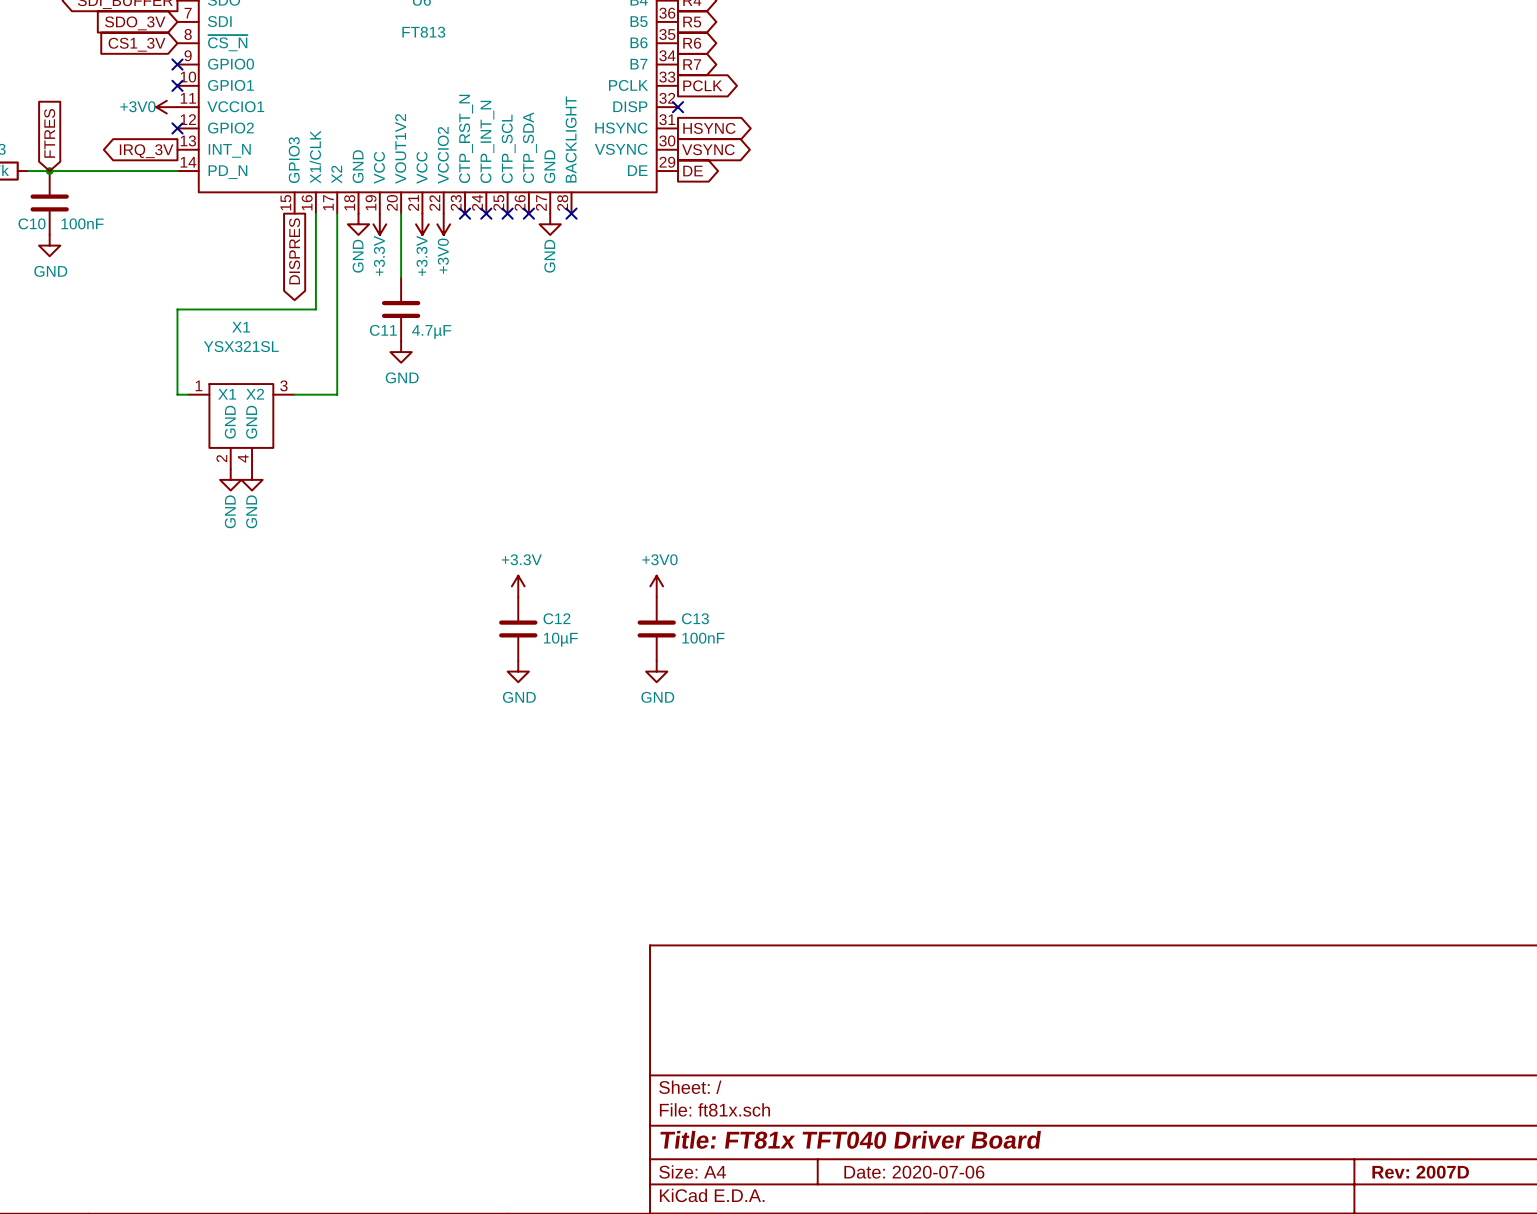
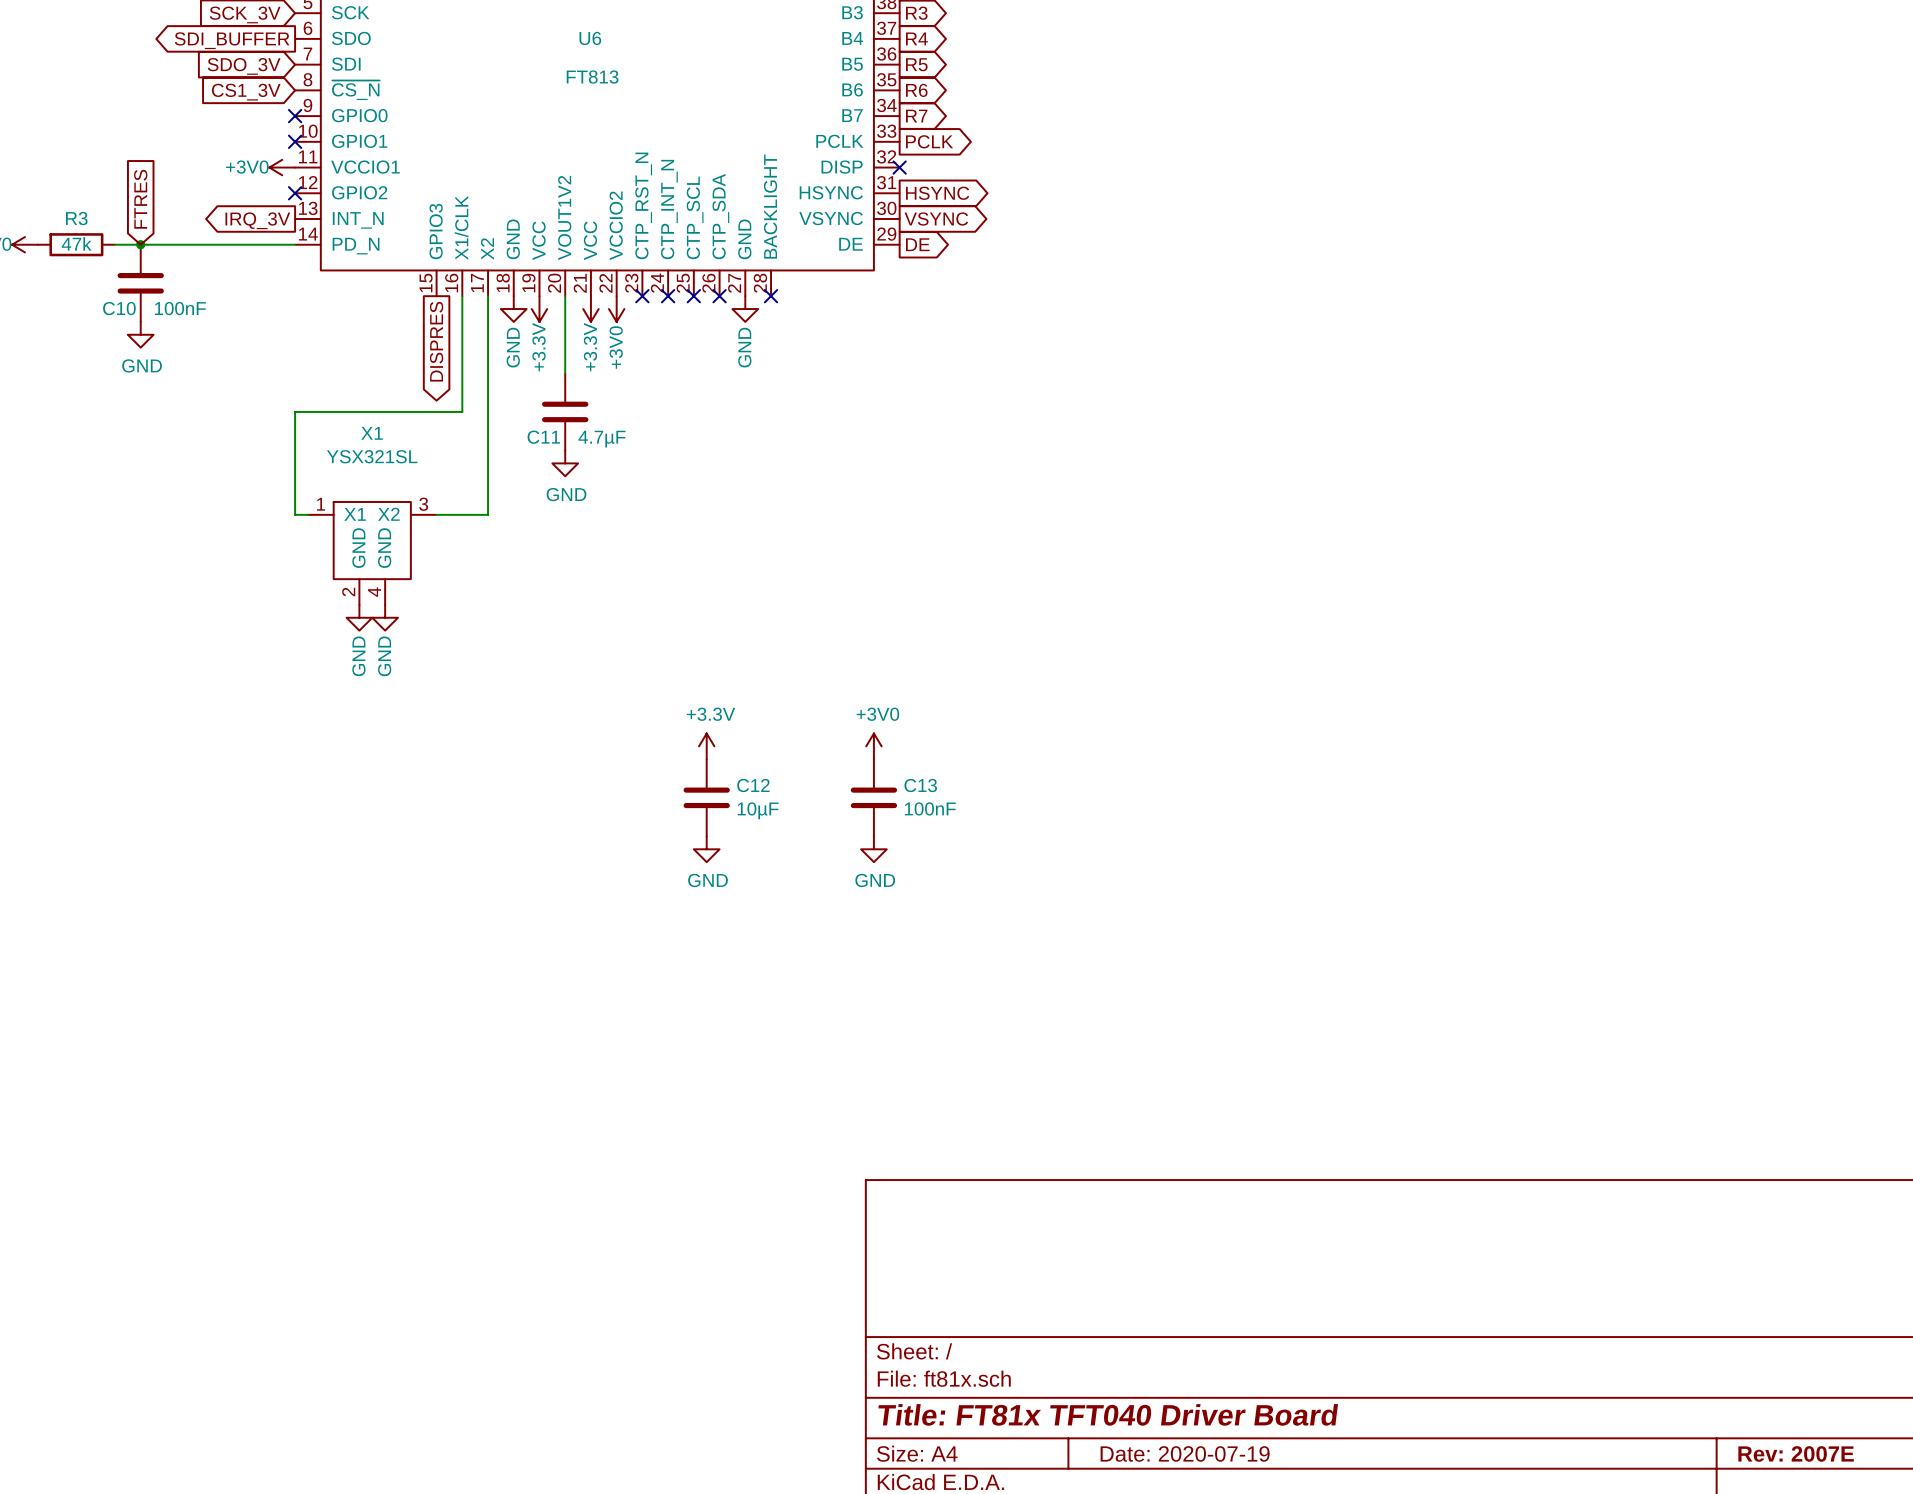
title block: Date: 2020-07-06 (914, 1172) -> Date: 2020-07-19 (1185, 1453)
title block: Rev: 2007D (1420, 1172) -> Rev: 2007E (1796, 1453)

